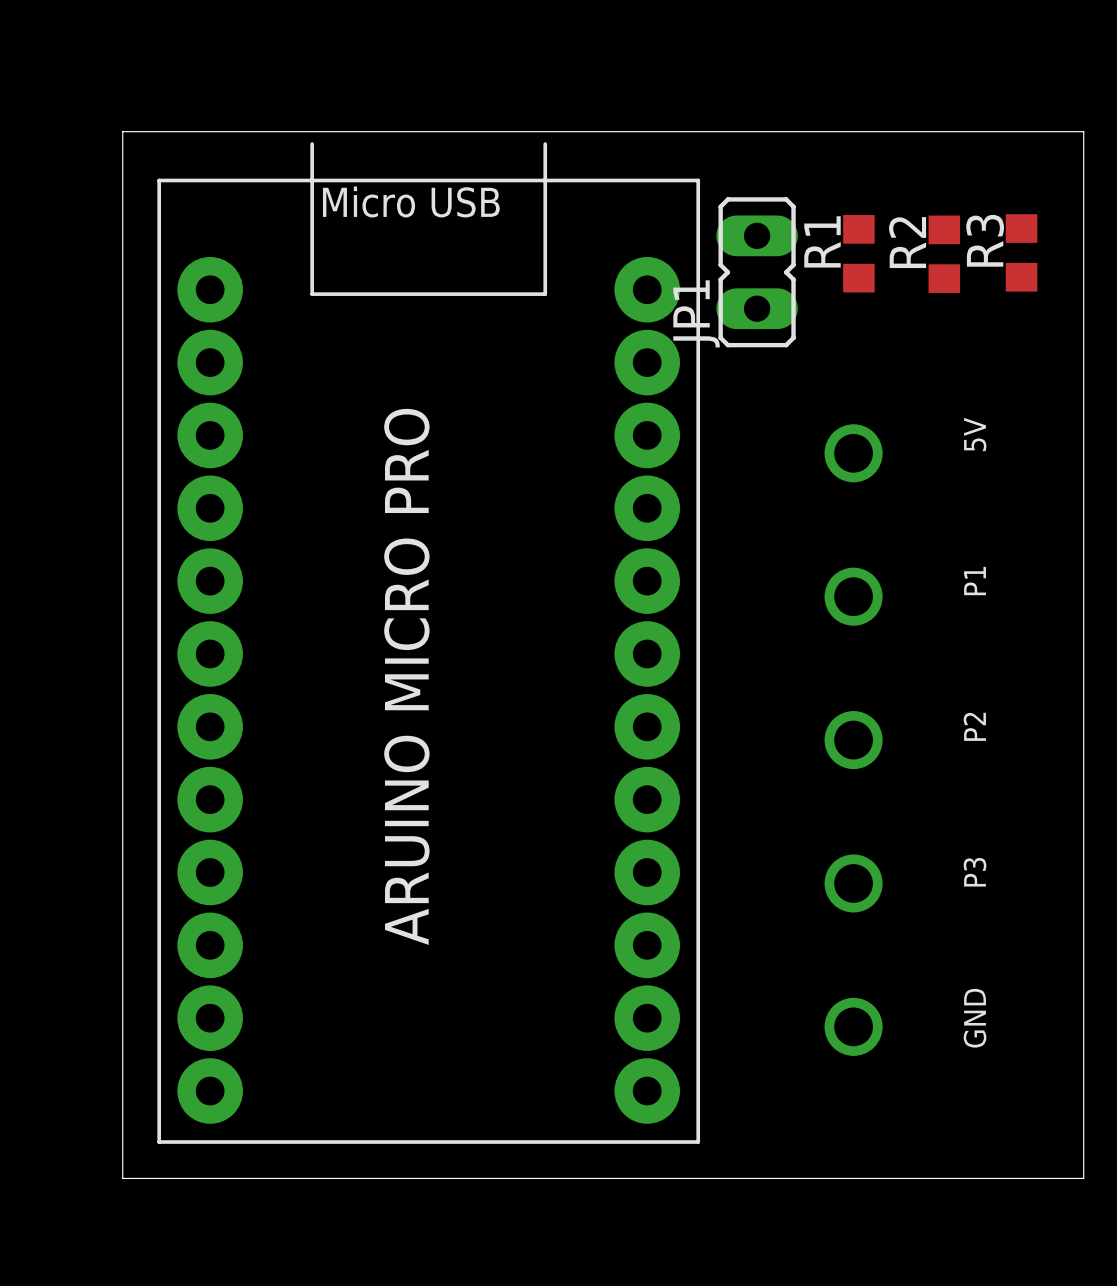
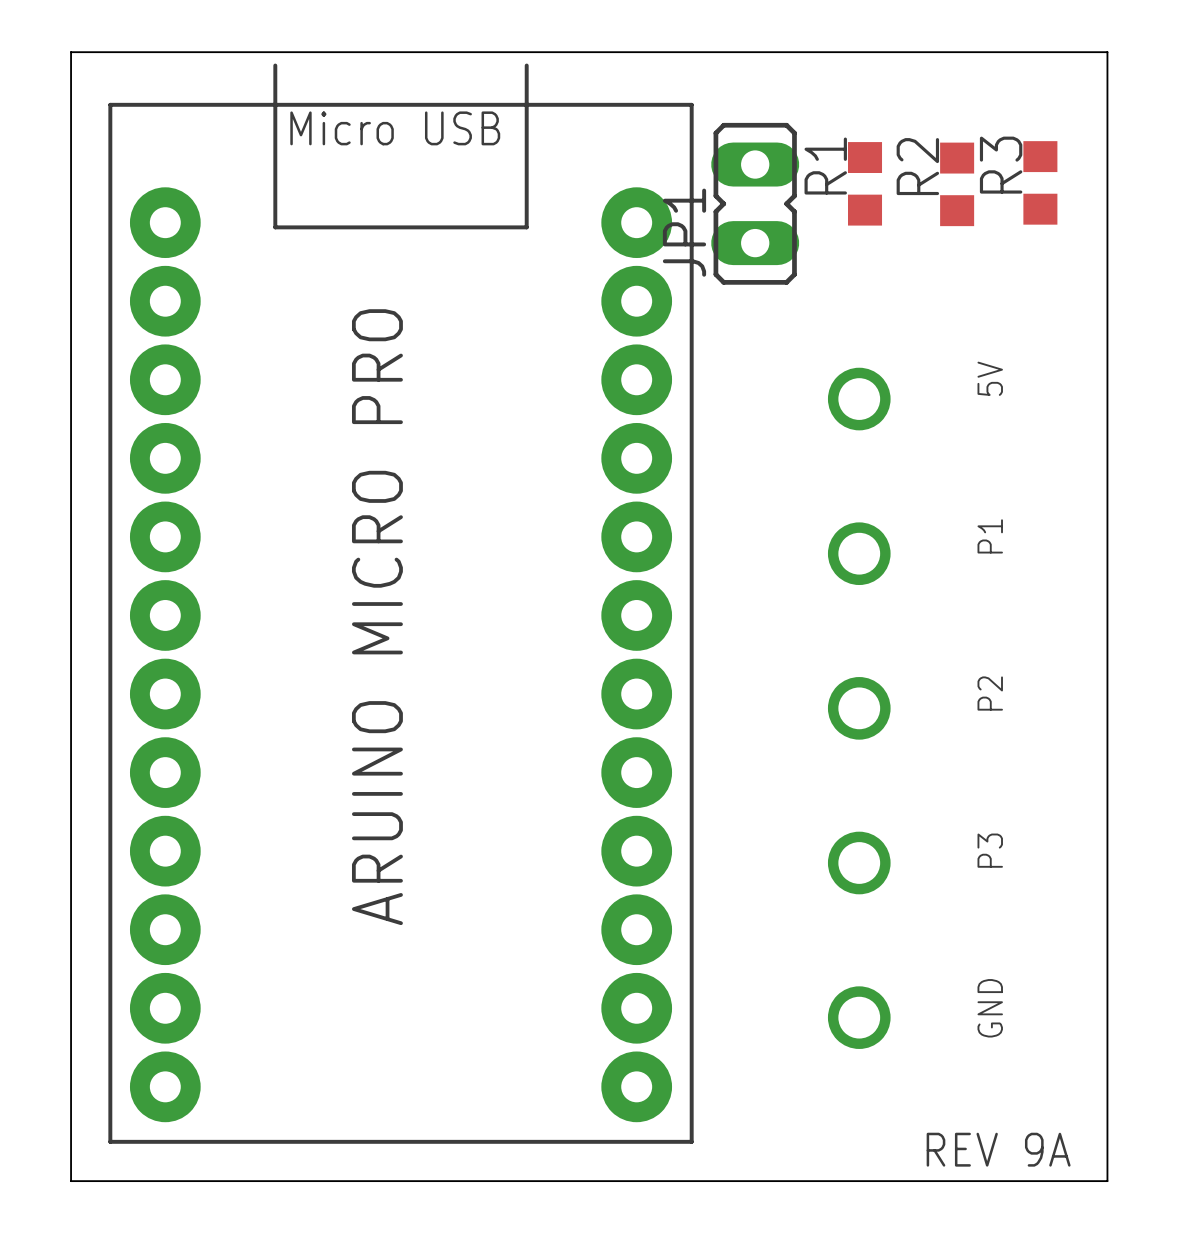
text: none -> REV 9A (998, 1149)

